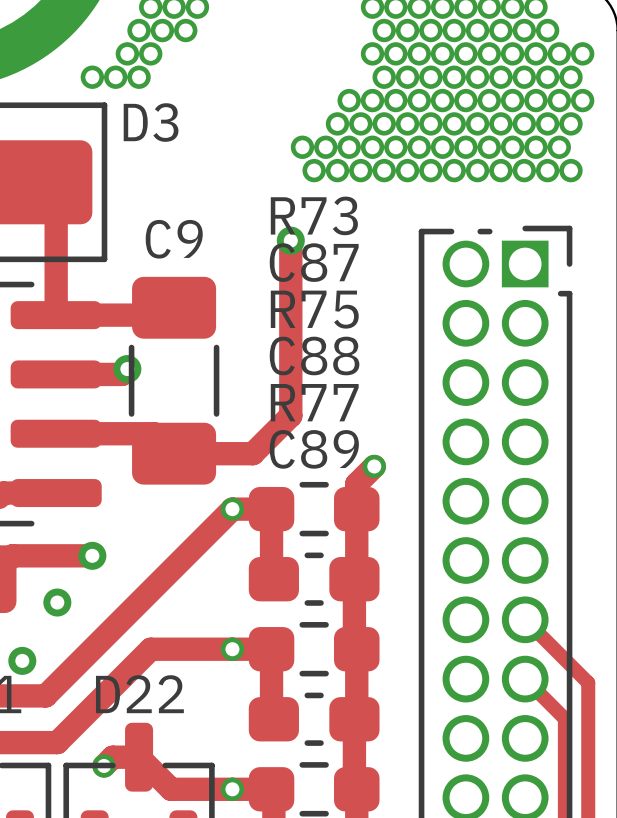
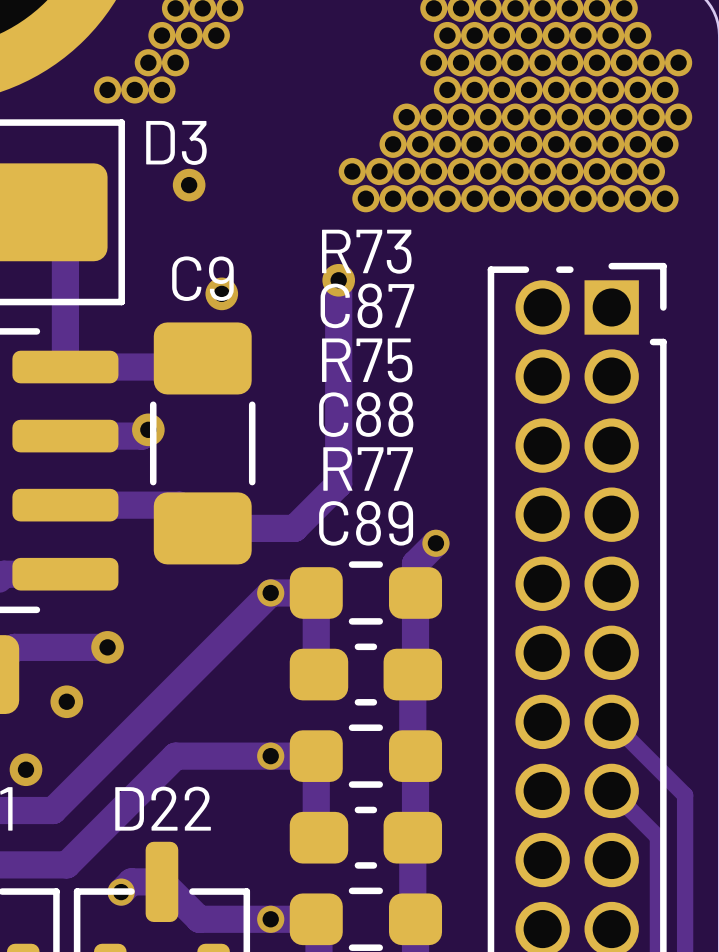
via: none -> (189, 185)
via: none -> (221, 293)

